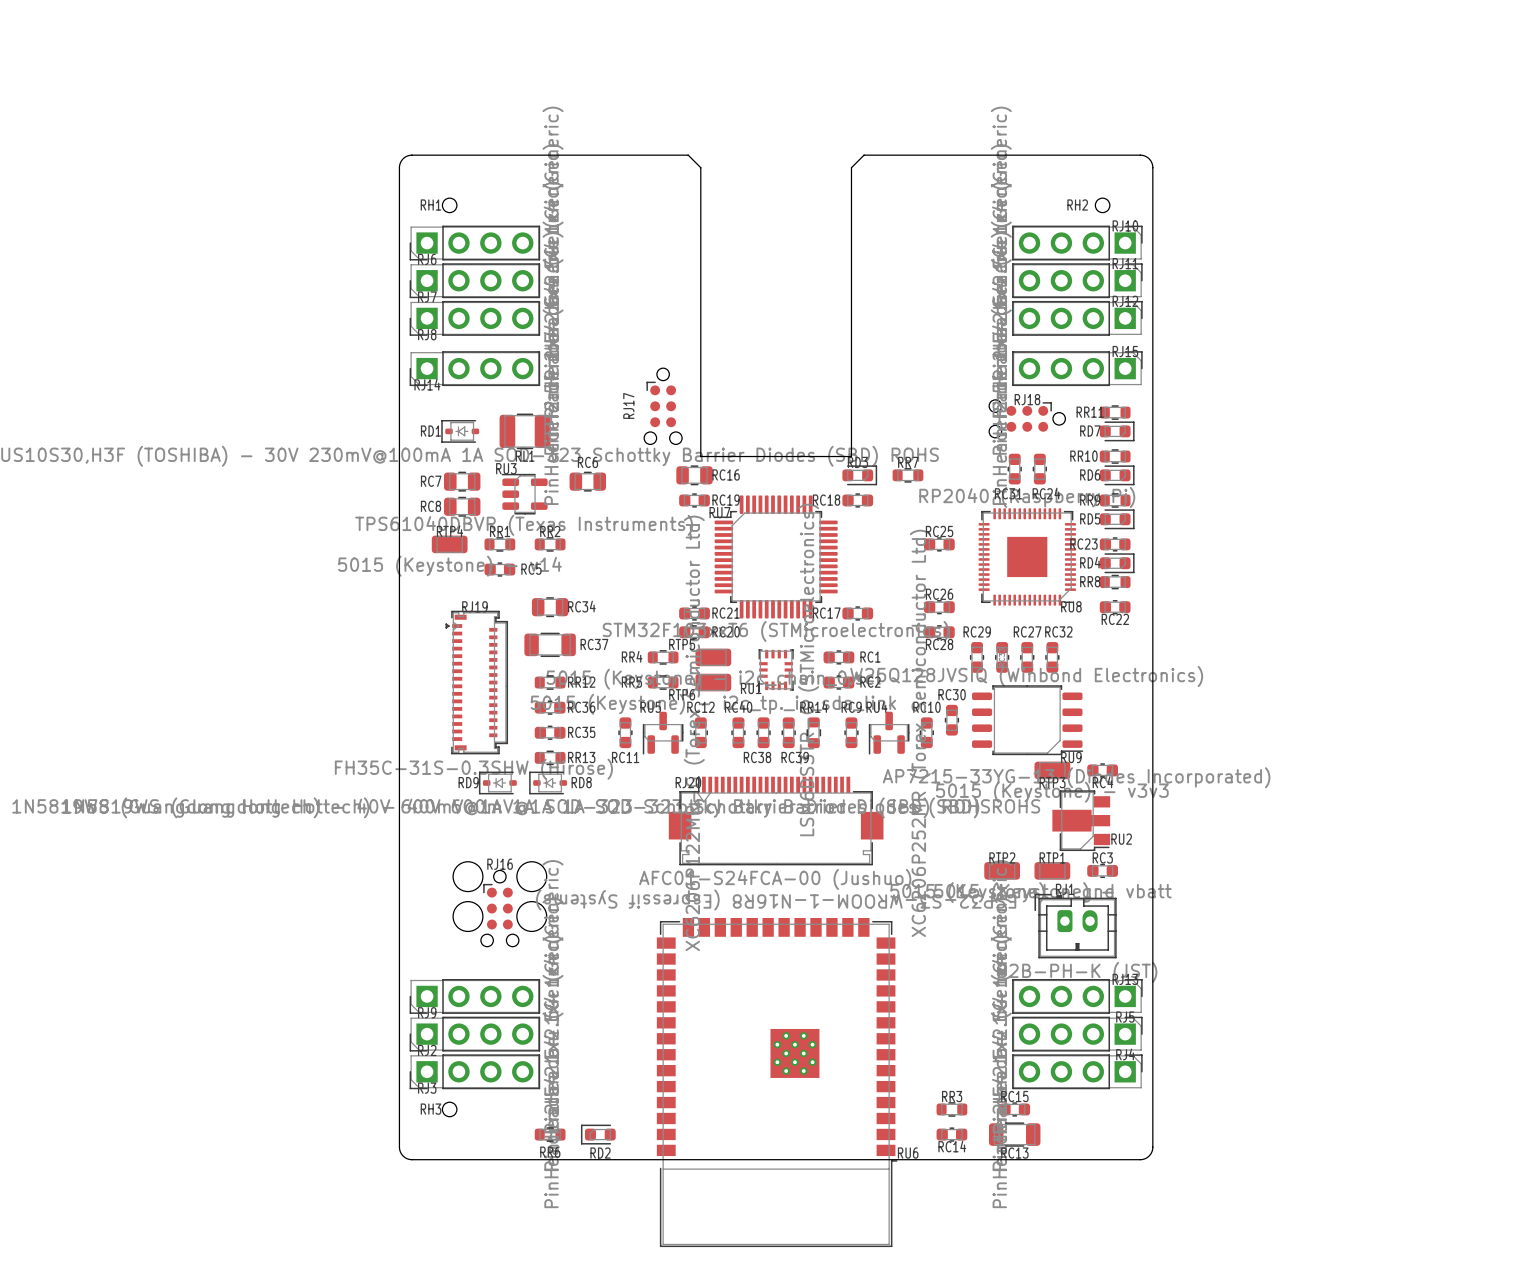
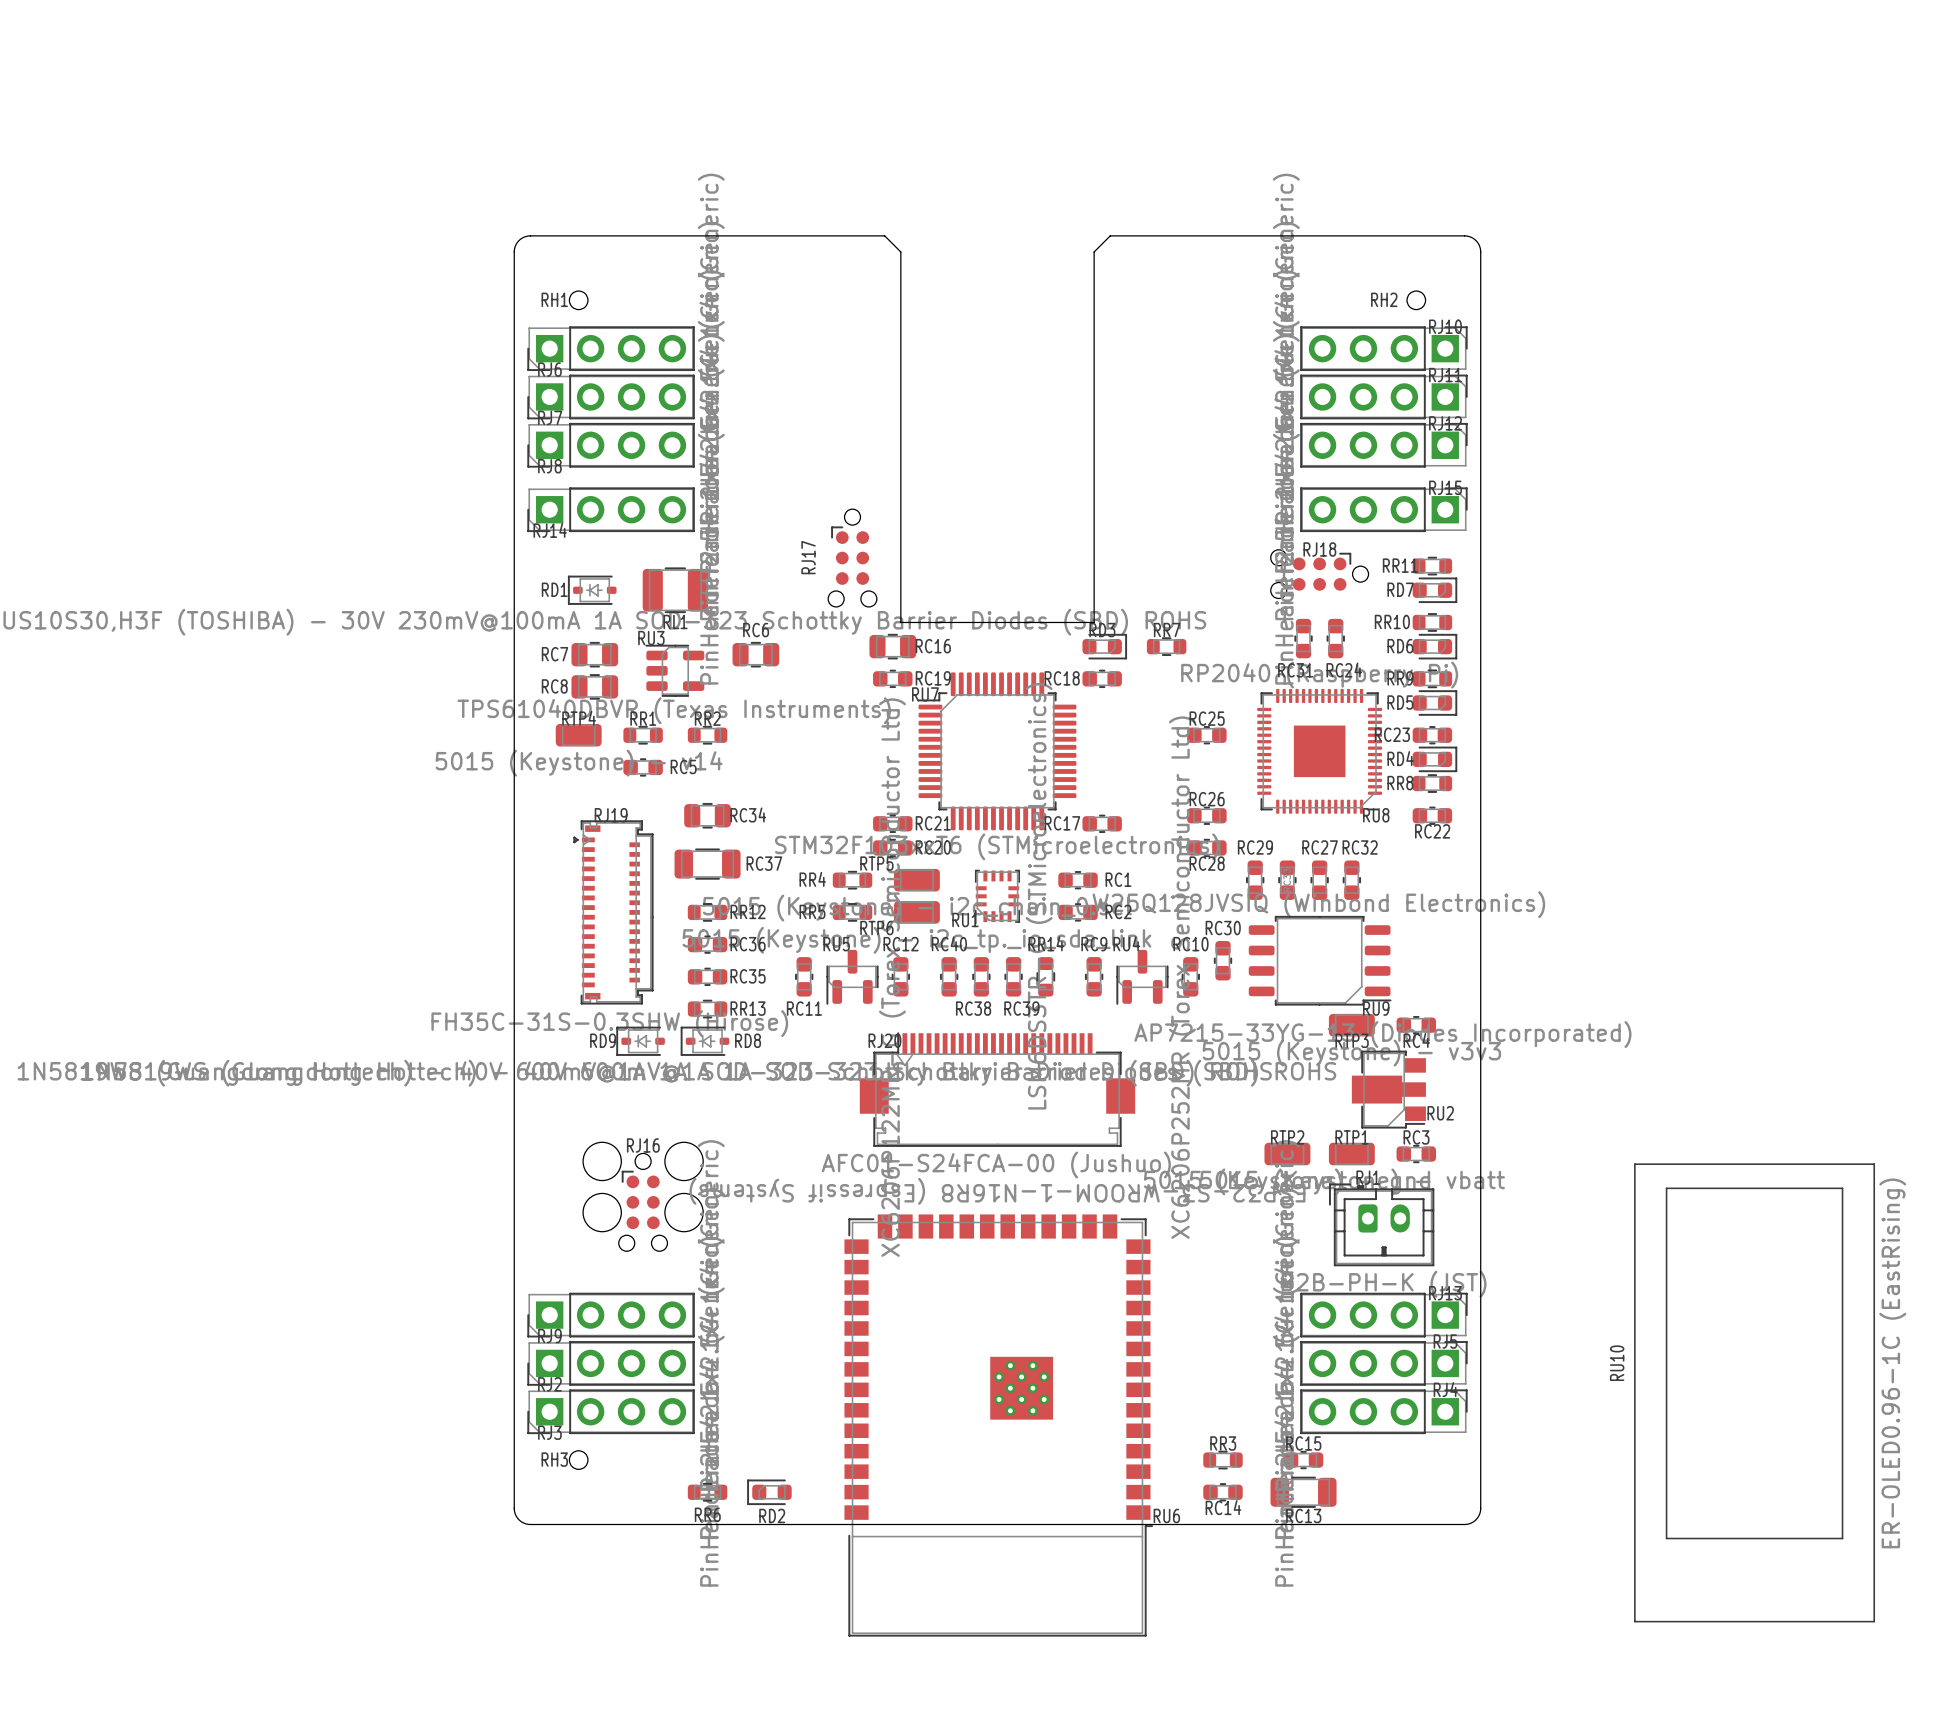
RU10: none -> ER-OLED0.96-1C (EastRising) (1754, 1392)

